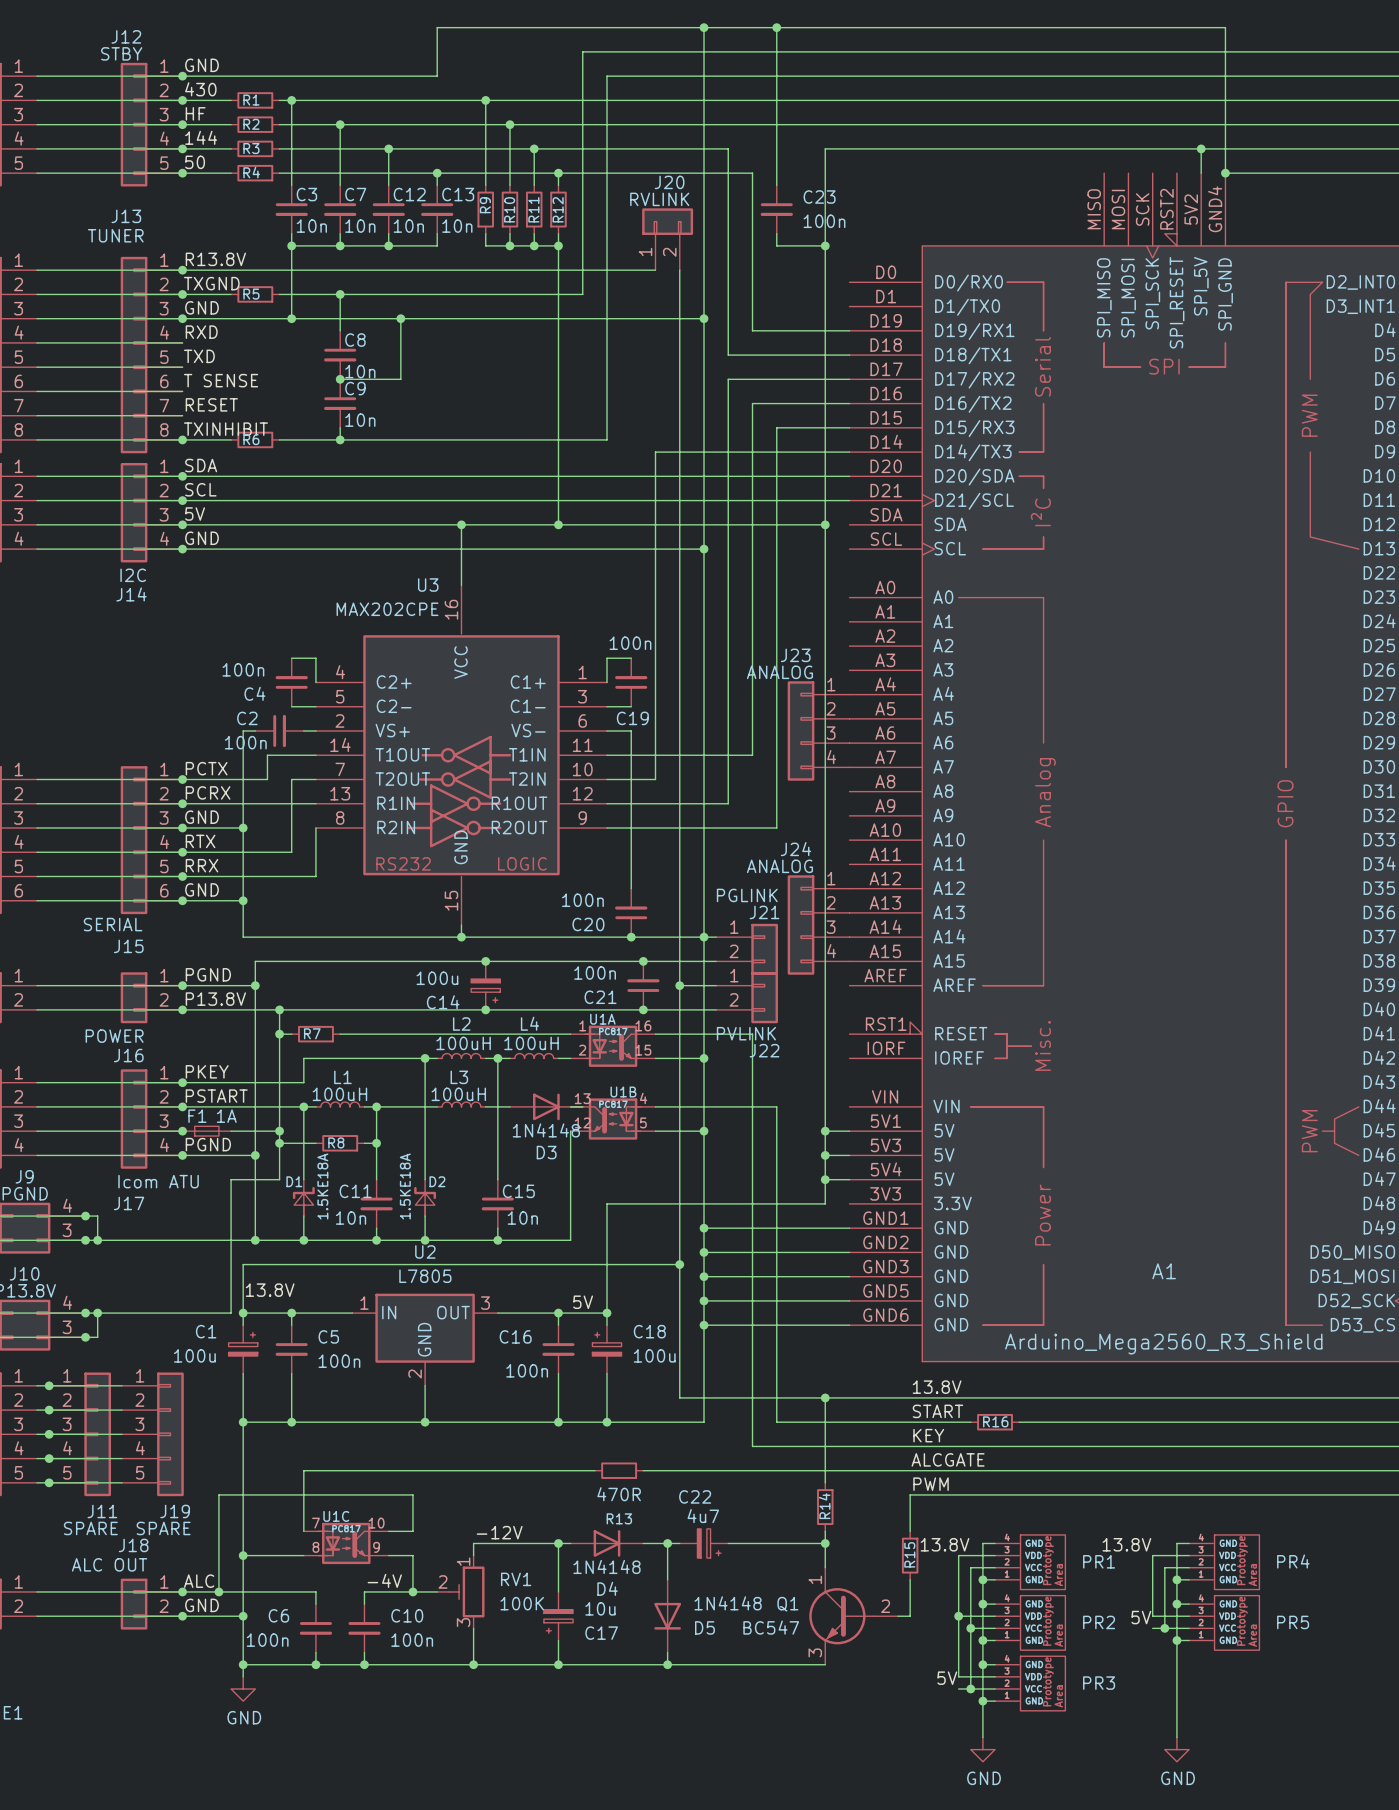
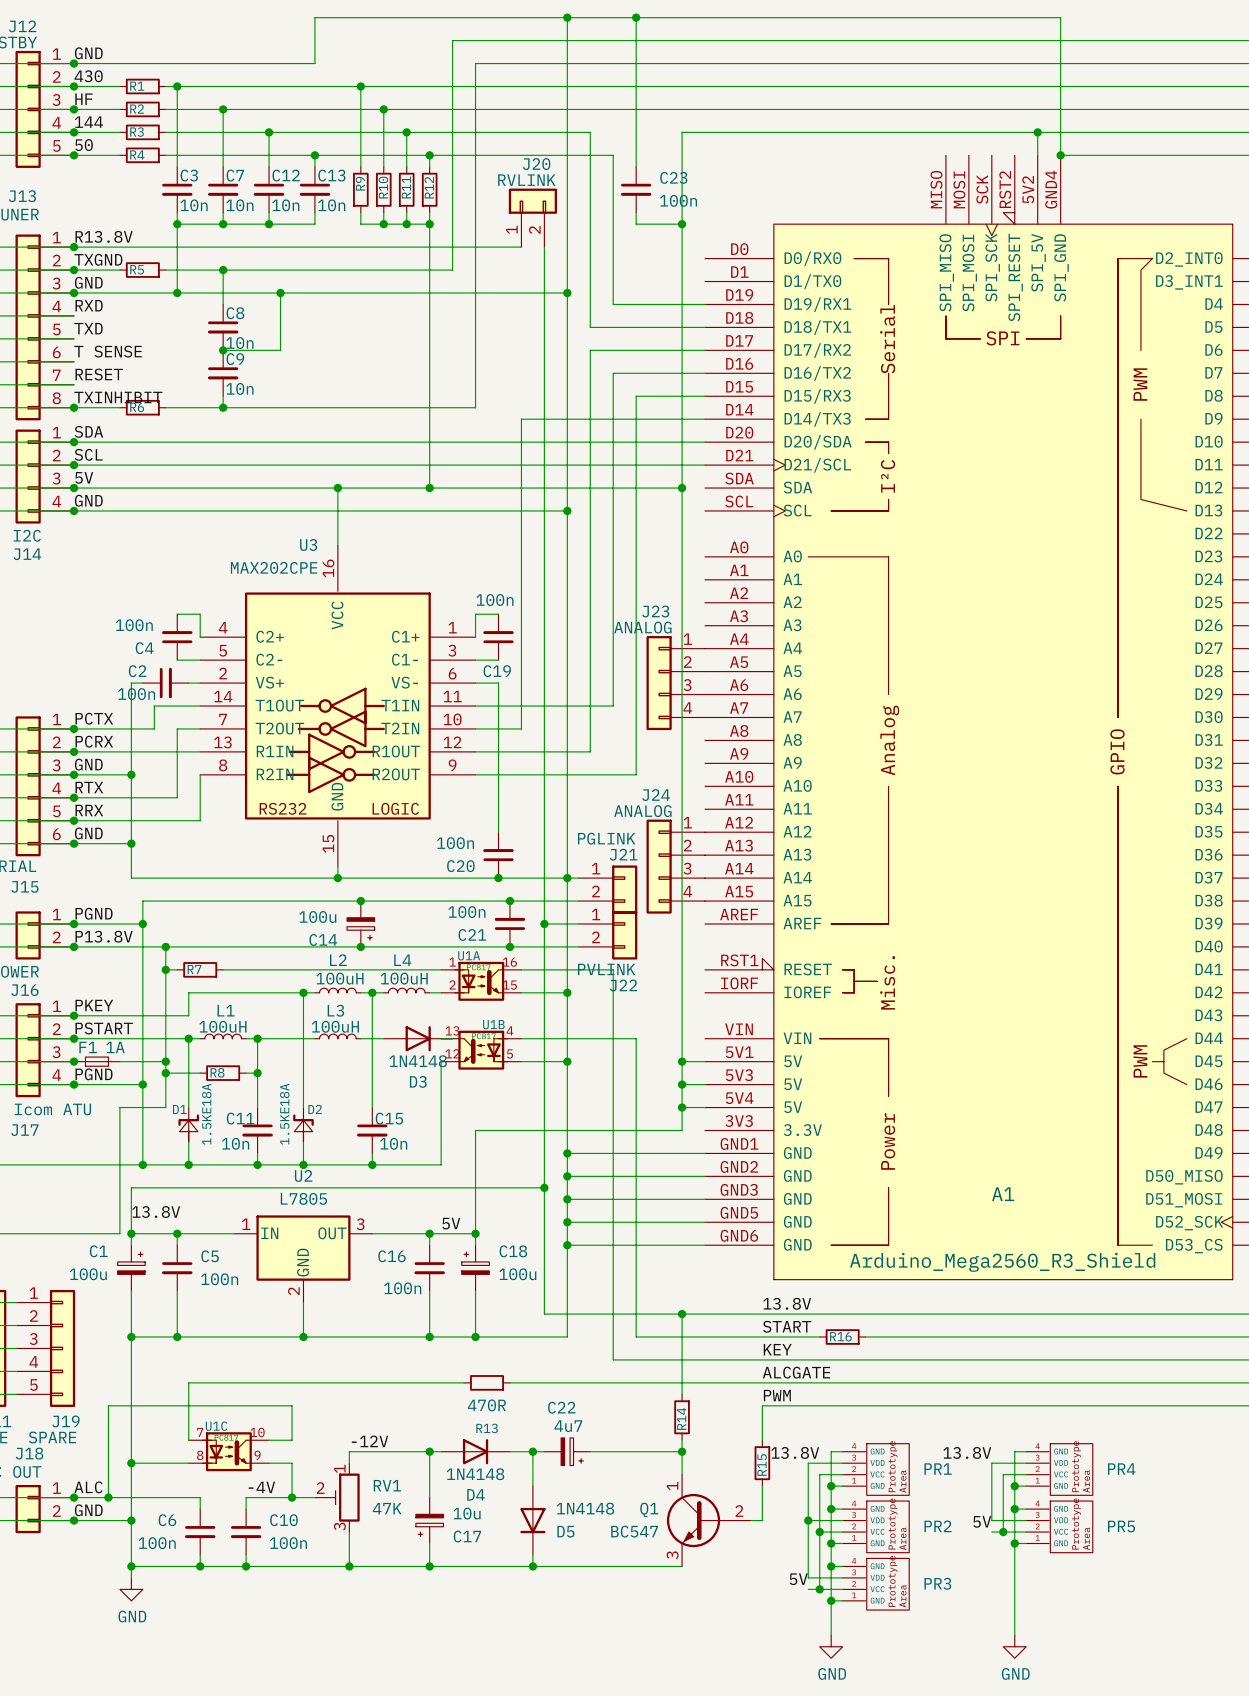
RV1 value: 100K (522, 1603) -> 47K (387, 1508)

